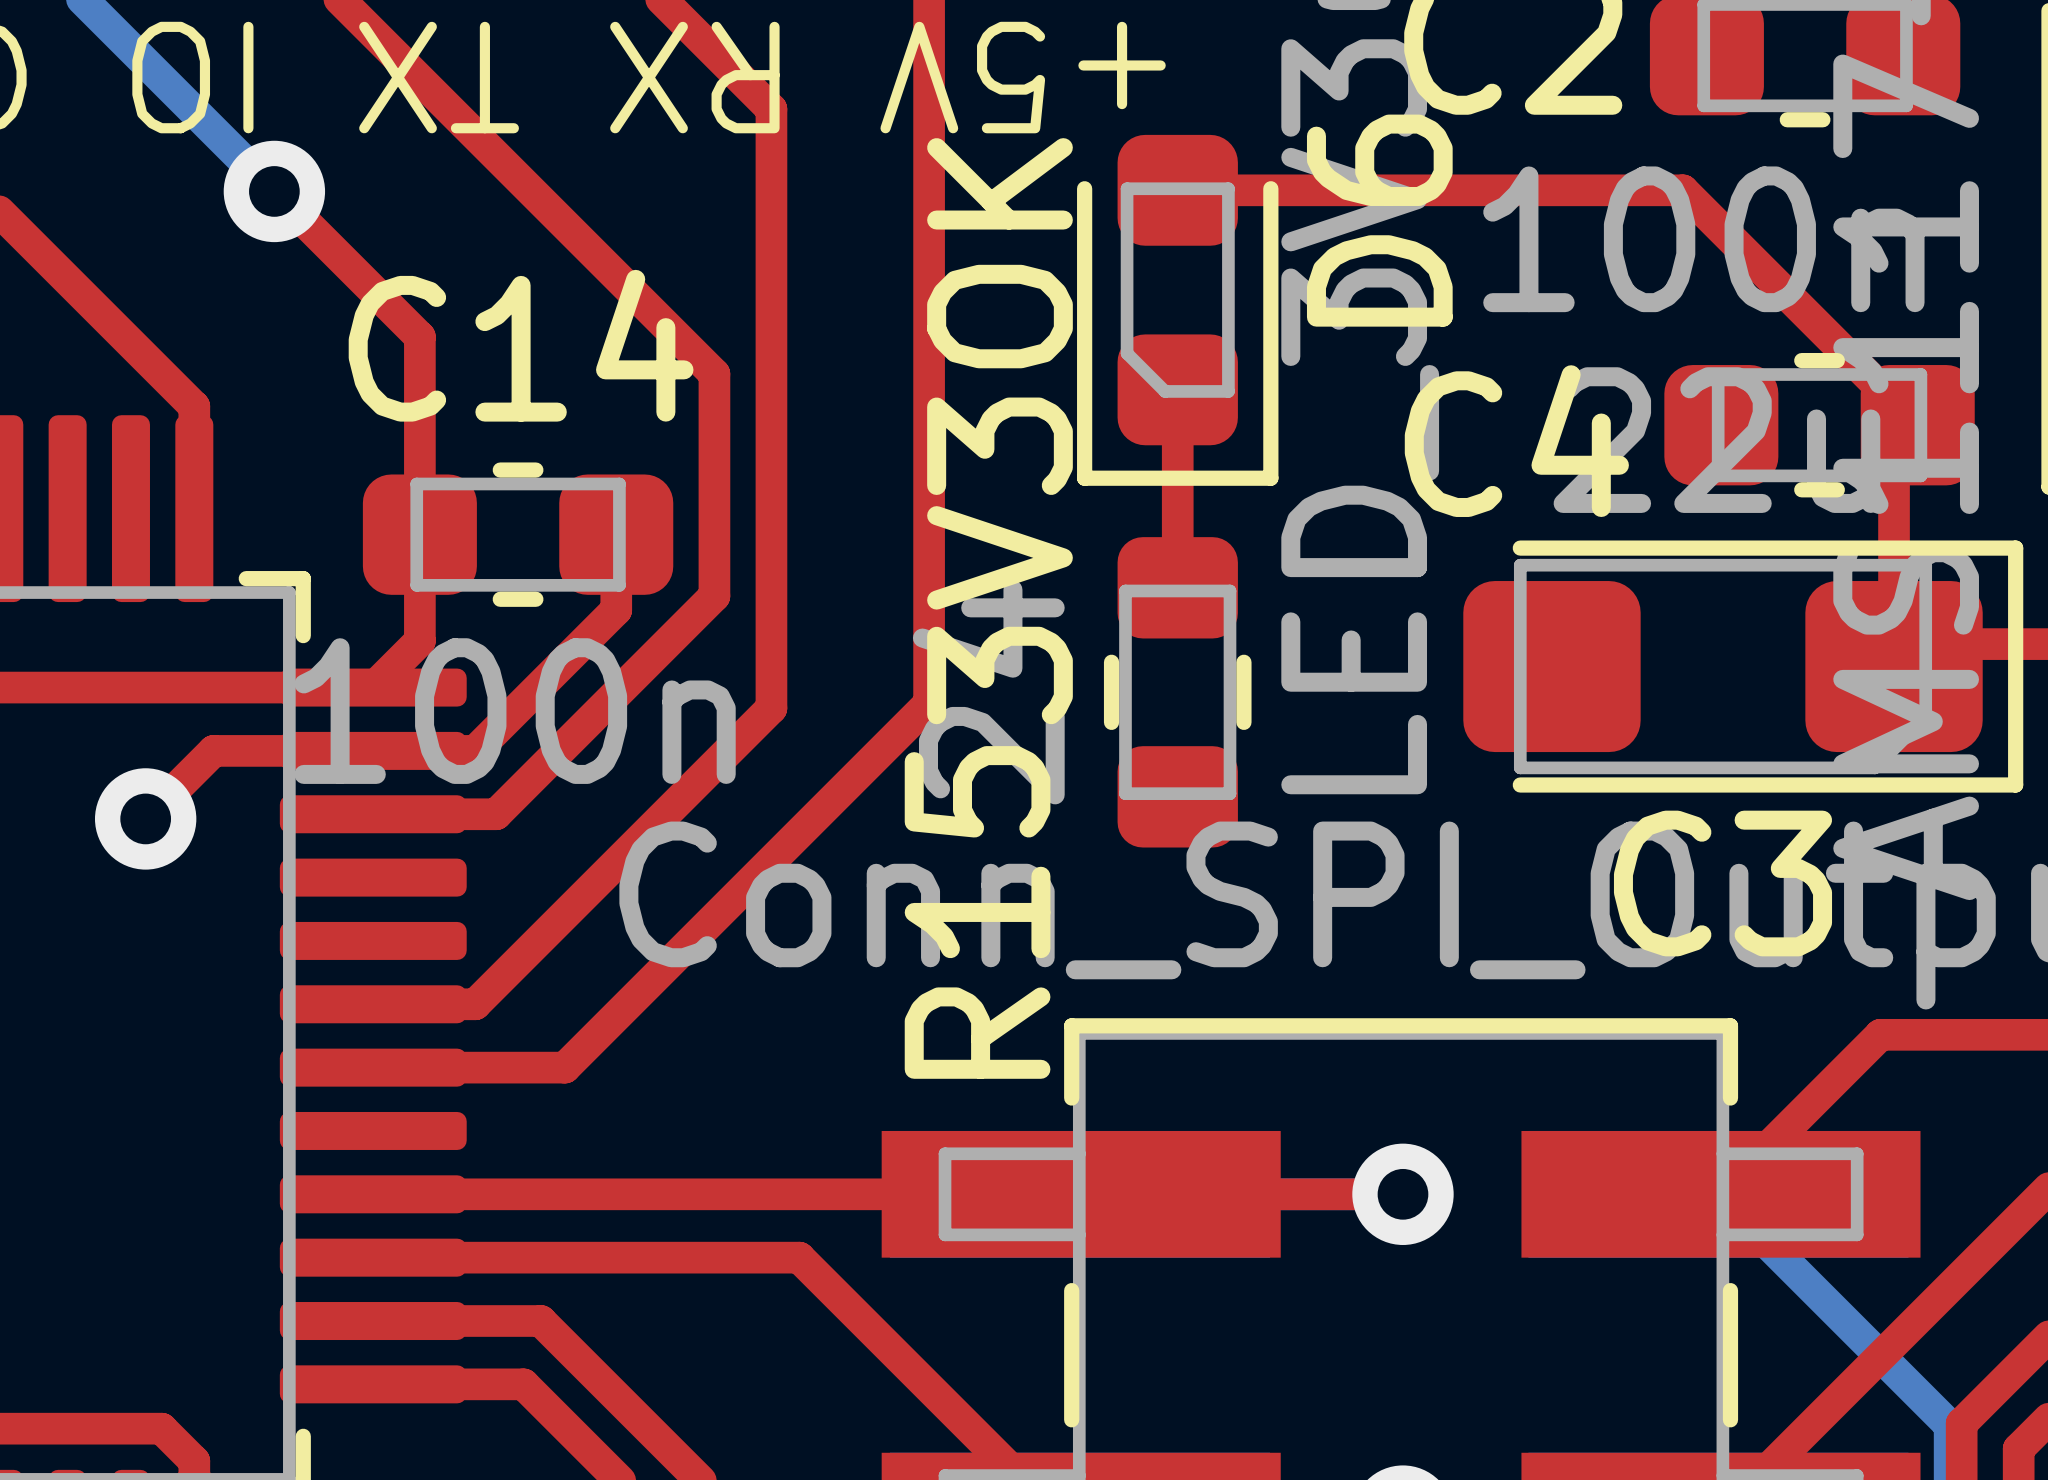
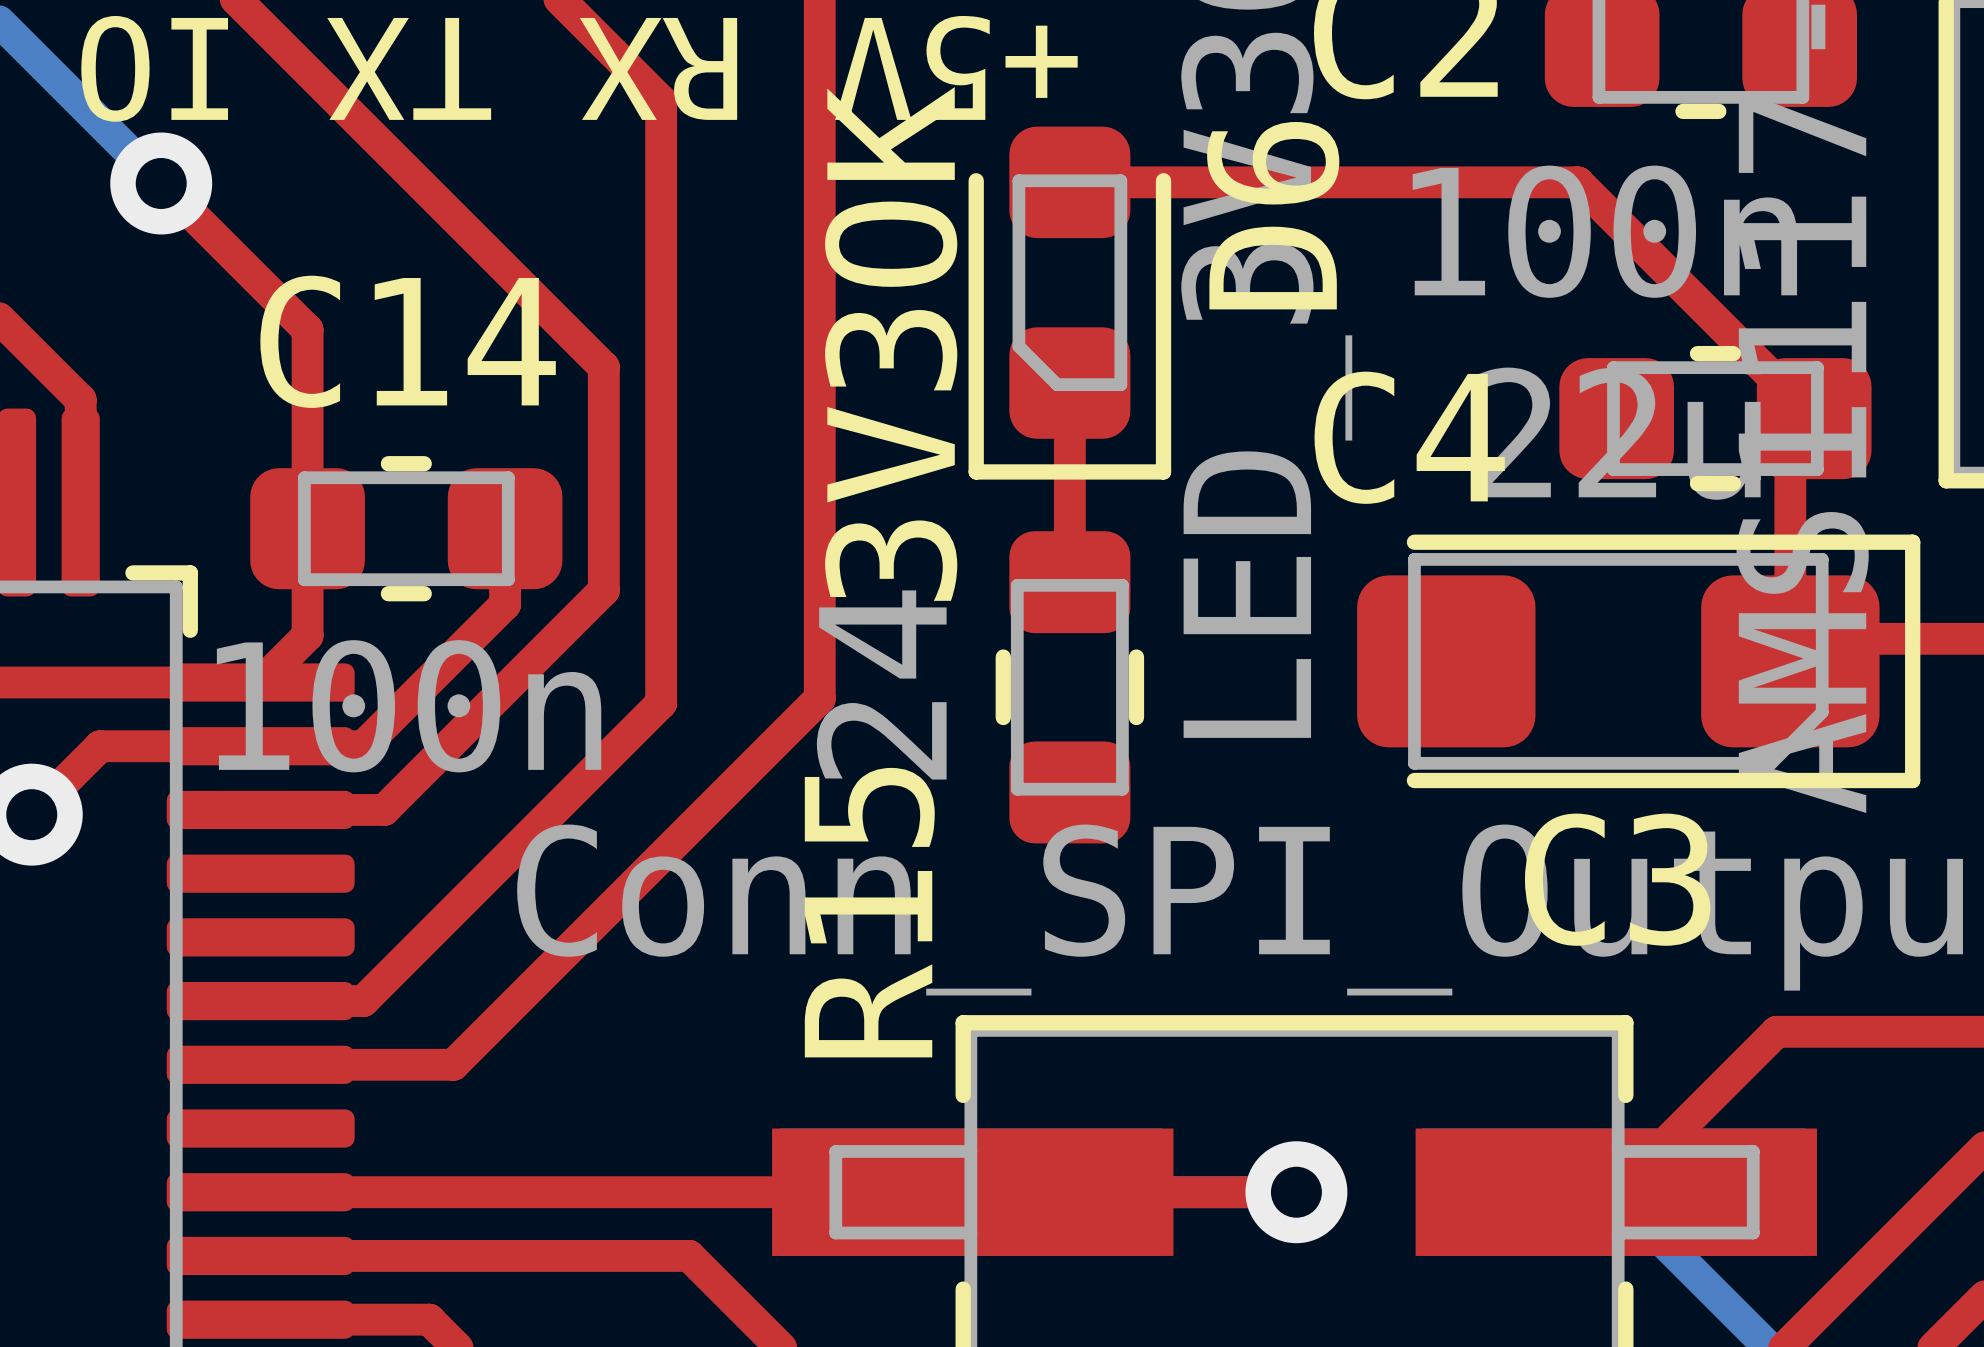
text position: 3V3OK (1000, 431) -> 3V3OK (891, 343)

